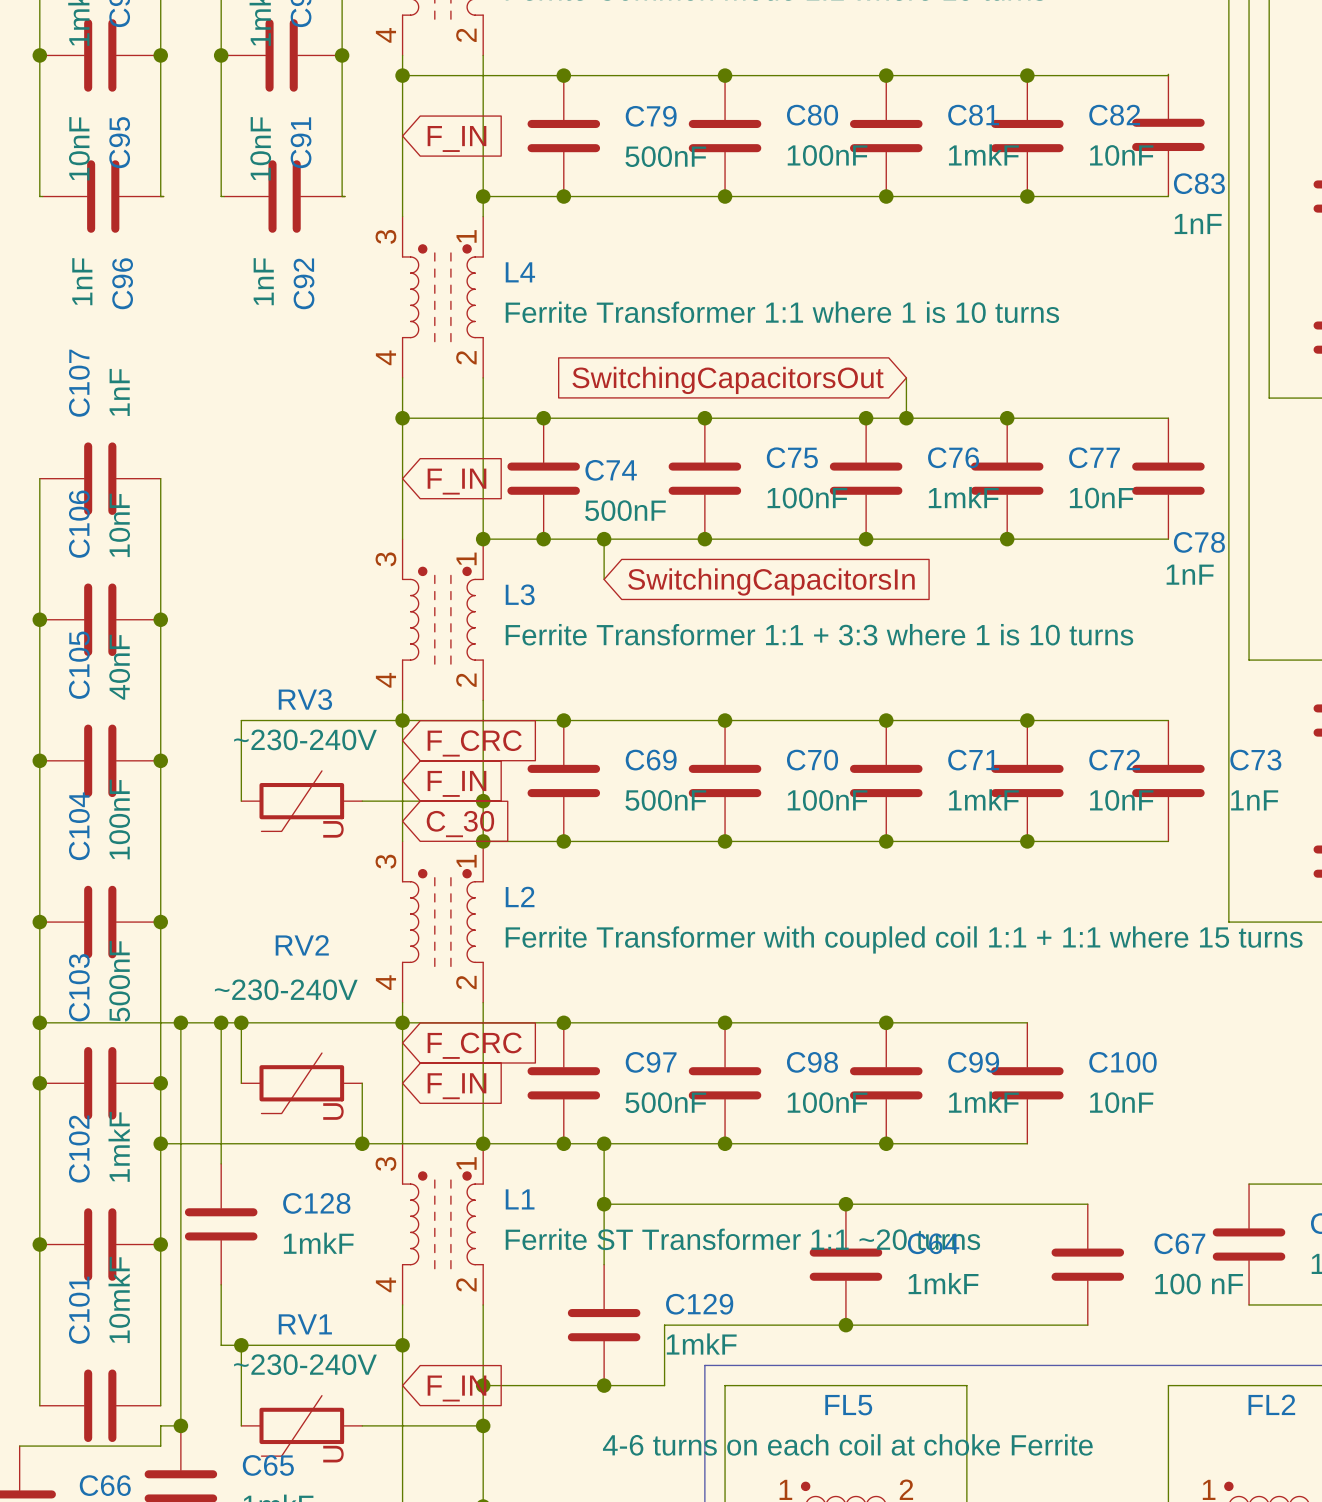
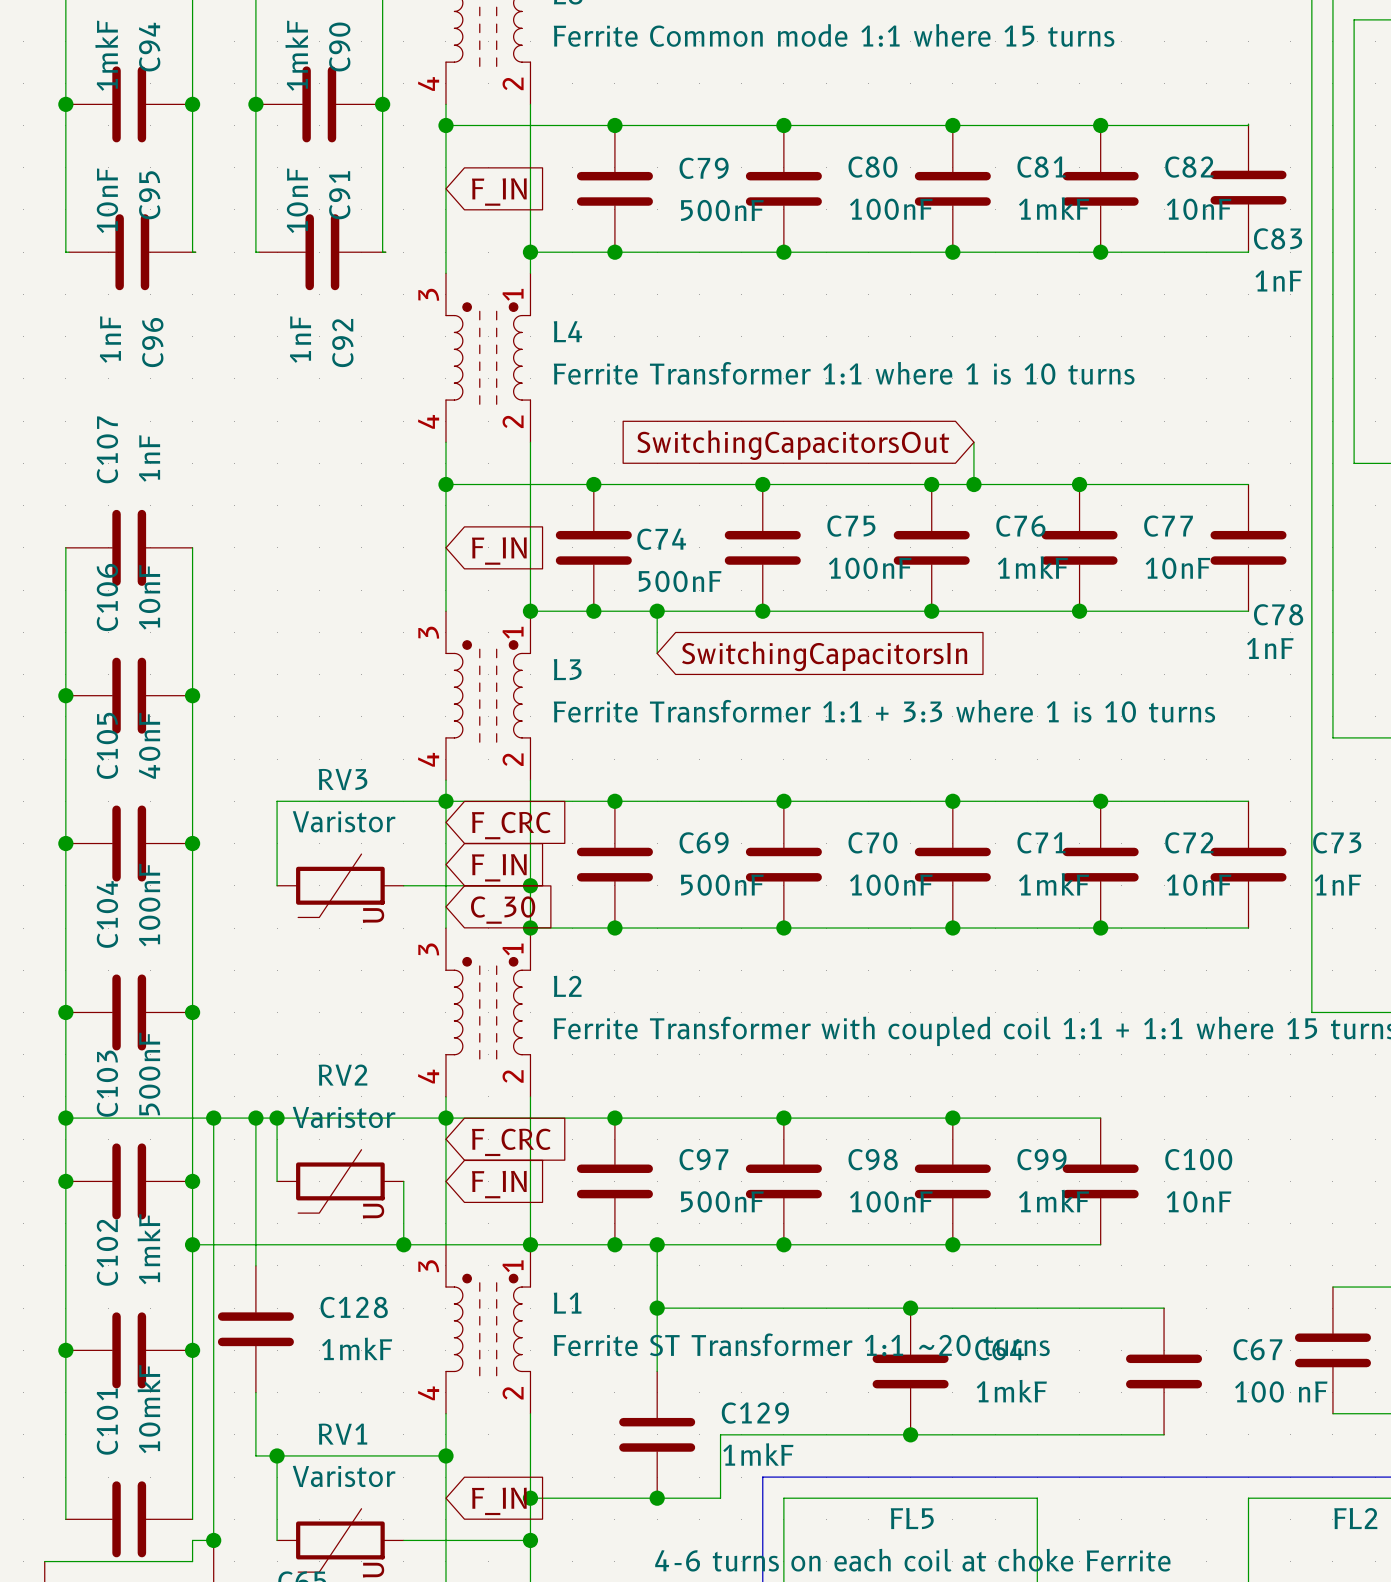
RV3 value: ~230-240V (305, 739) -> Varistor (344, 821)
RV2 name position: RV2 (302, 945) -> RV2 (343, 1075)
RV2 value: ~230-240V (286, 989) -> Varistor (344, 1117)
RV1 value: ~230-240V (305, 1364) -> Varistor (344, 1476)

